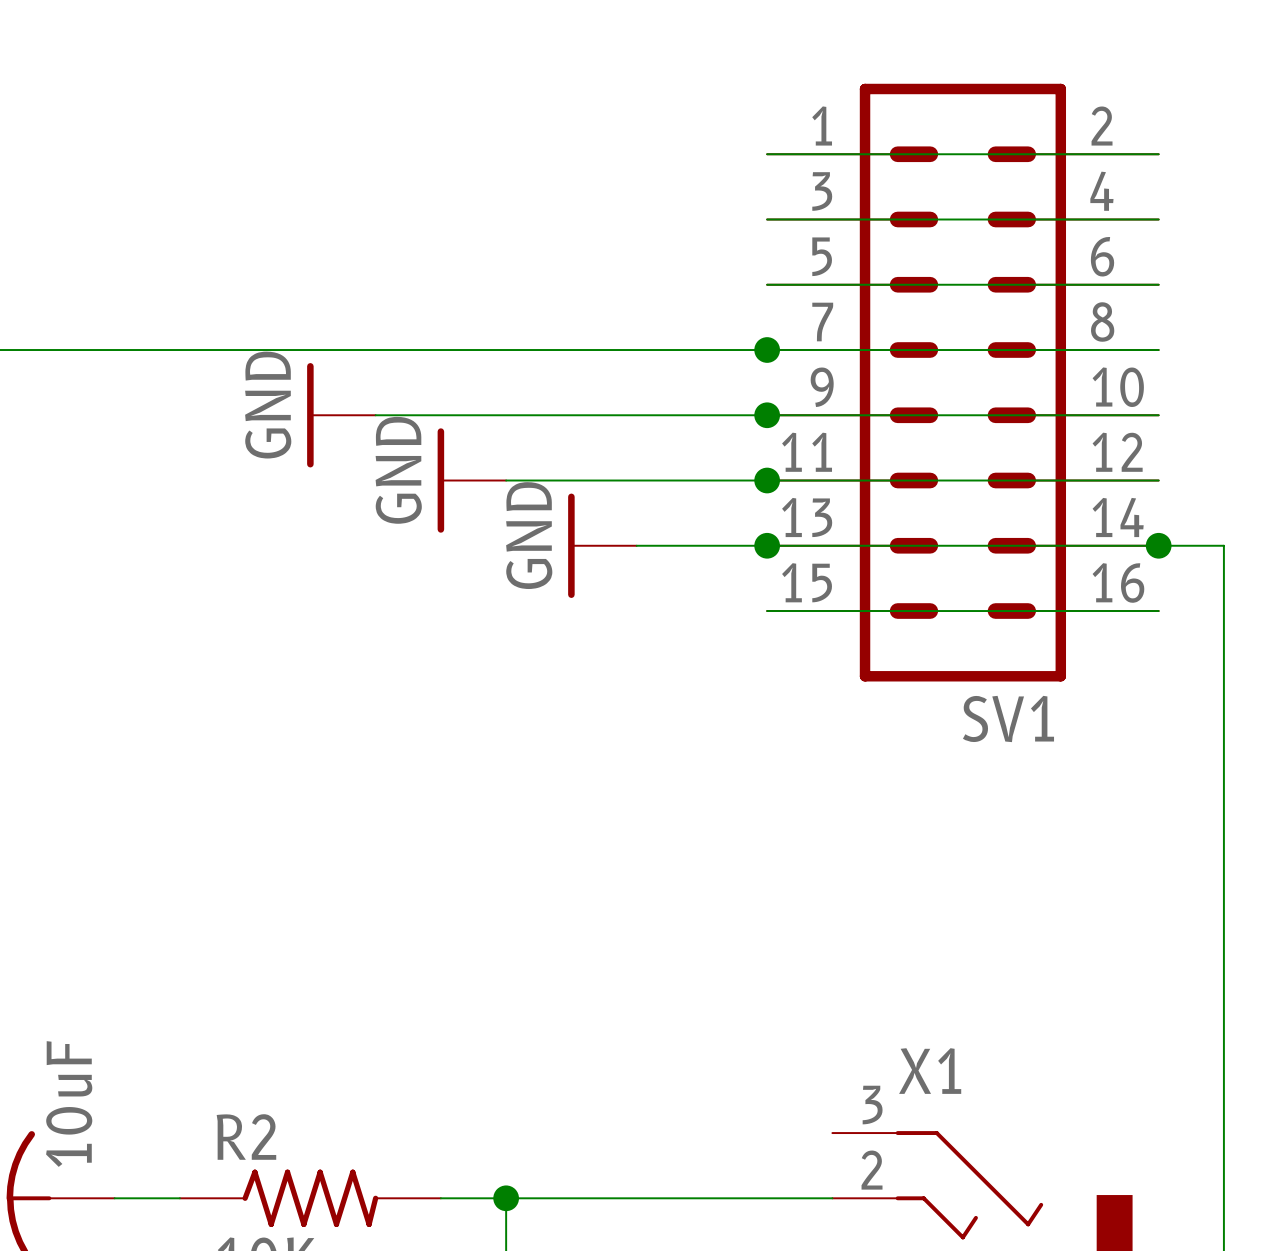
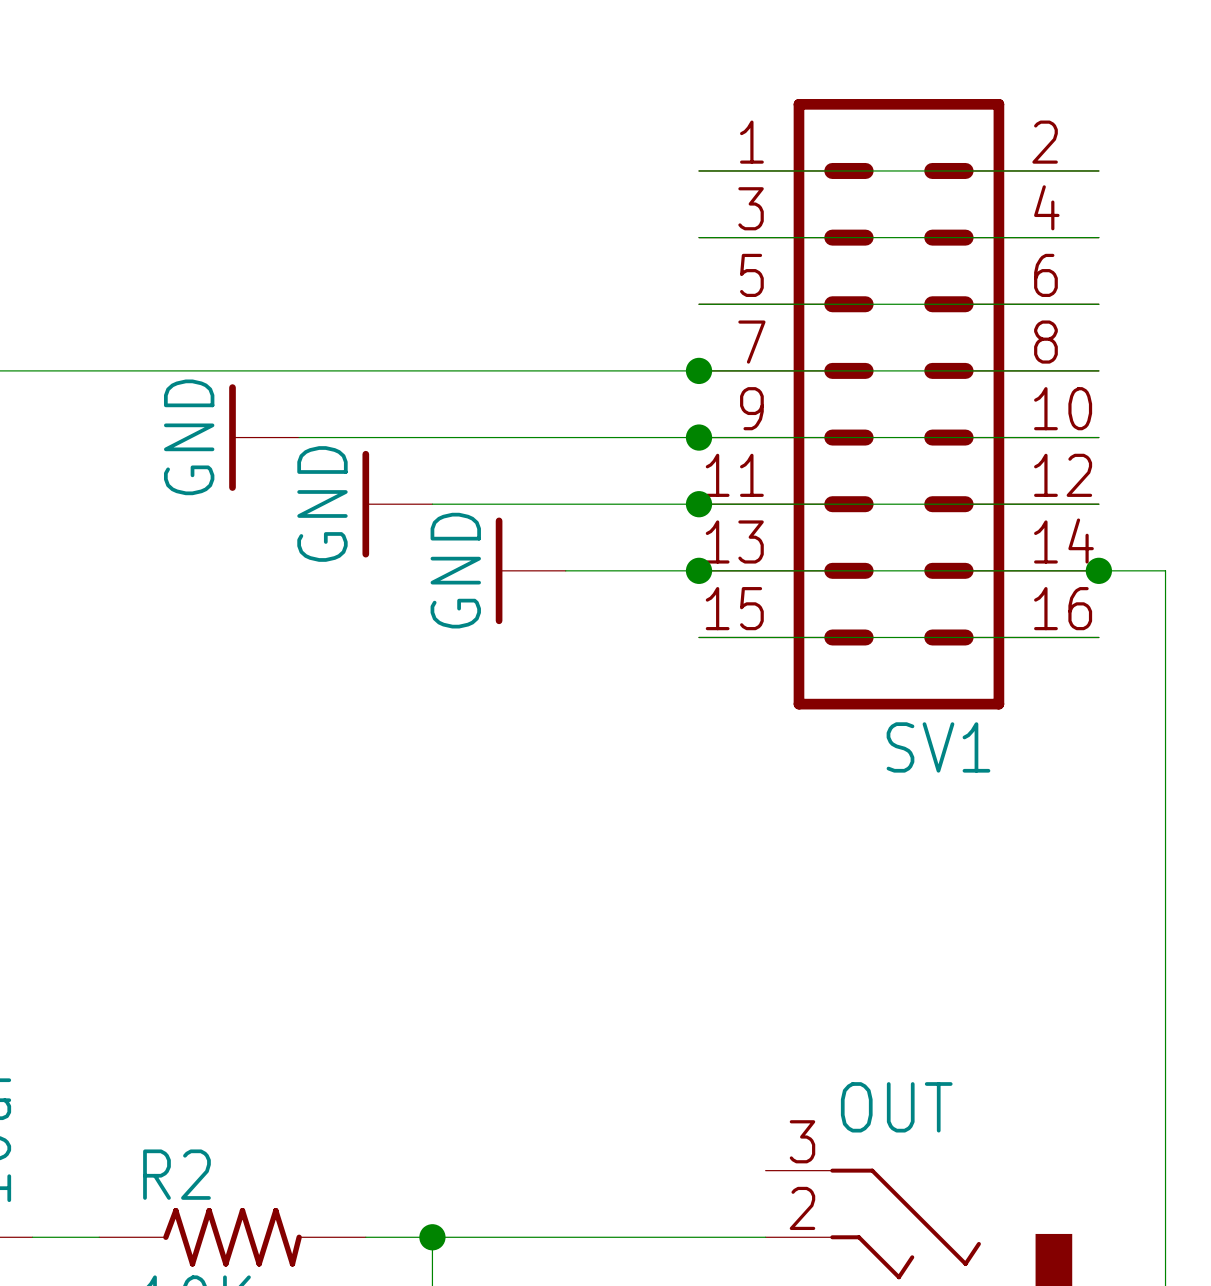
X1 name: X1 (930, 1071) -> OUT (896, 1107)

